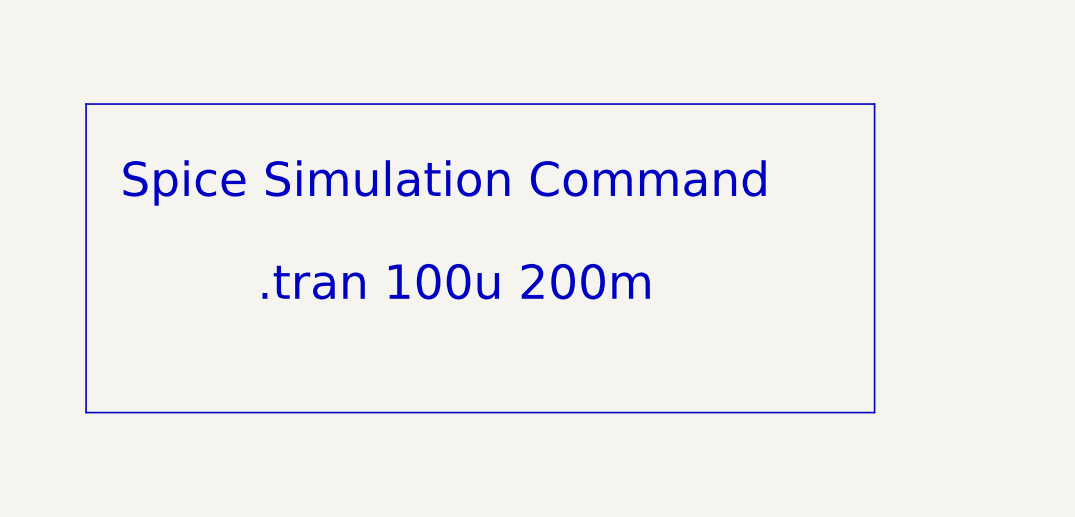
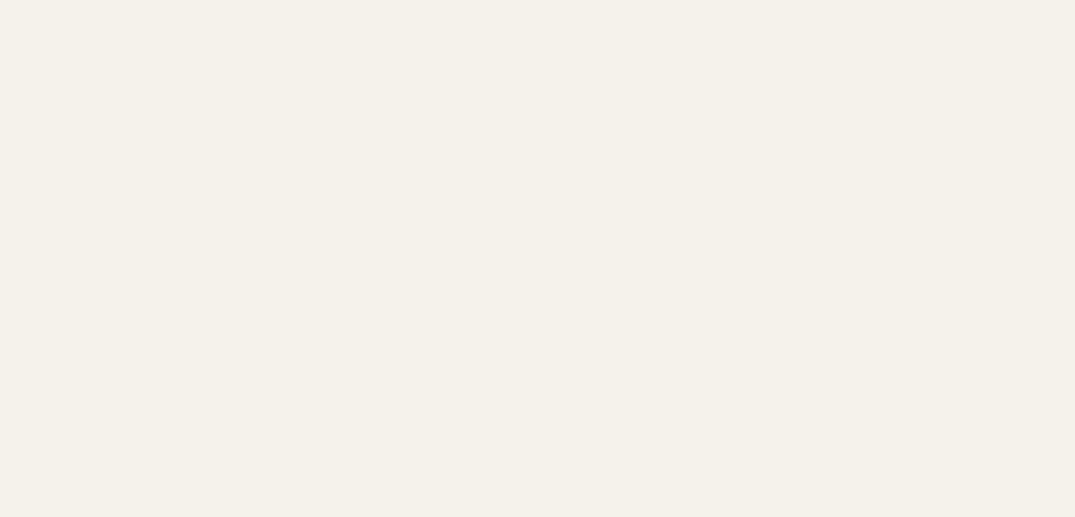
line: (86, 104) (86, 412) (874, 412) (874, 104) (86, 104) -> none
text: Spice Simulation Command (444, 182) -> none
text: .tran 100u 200m (456, 281) -> none

